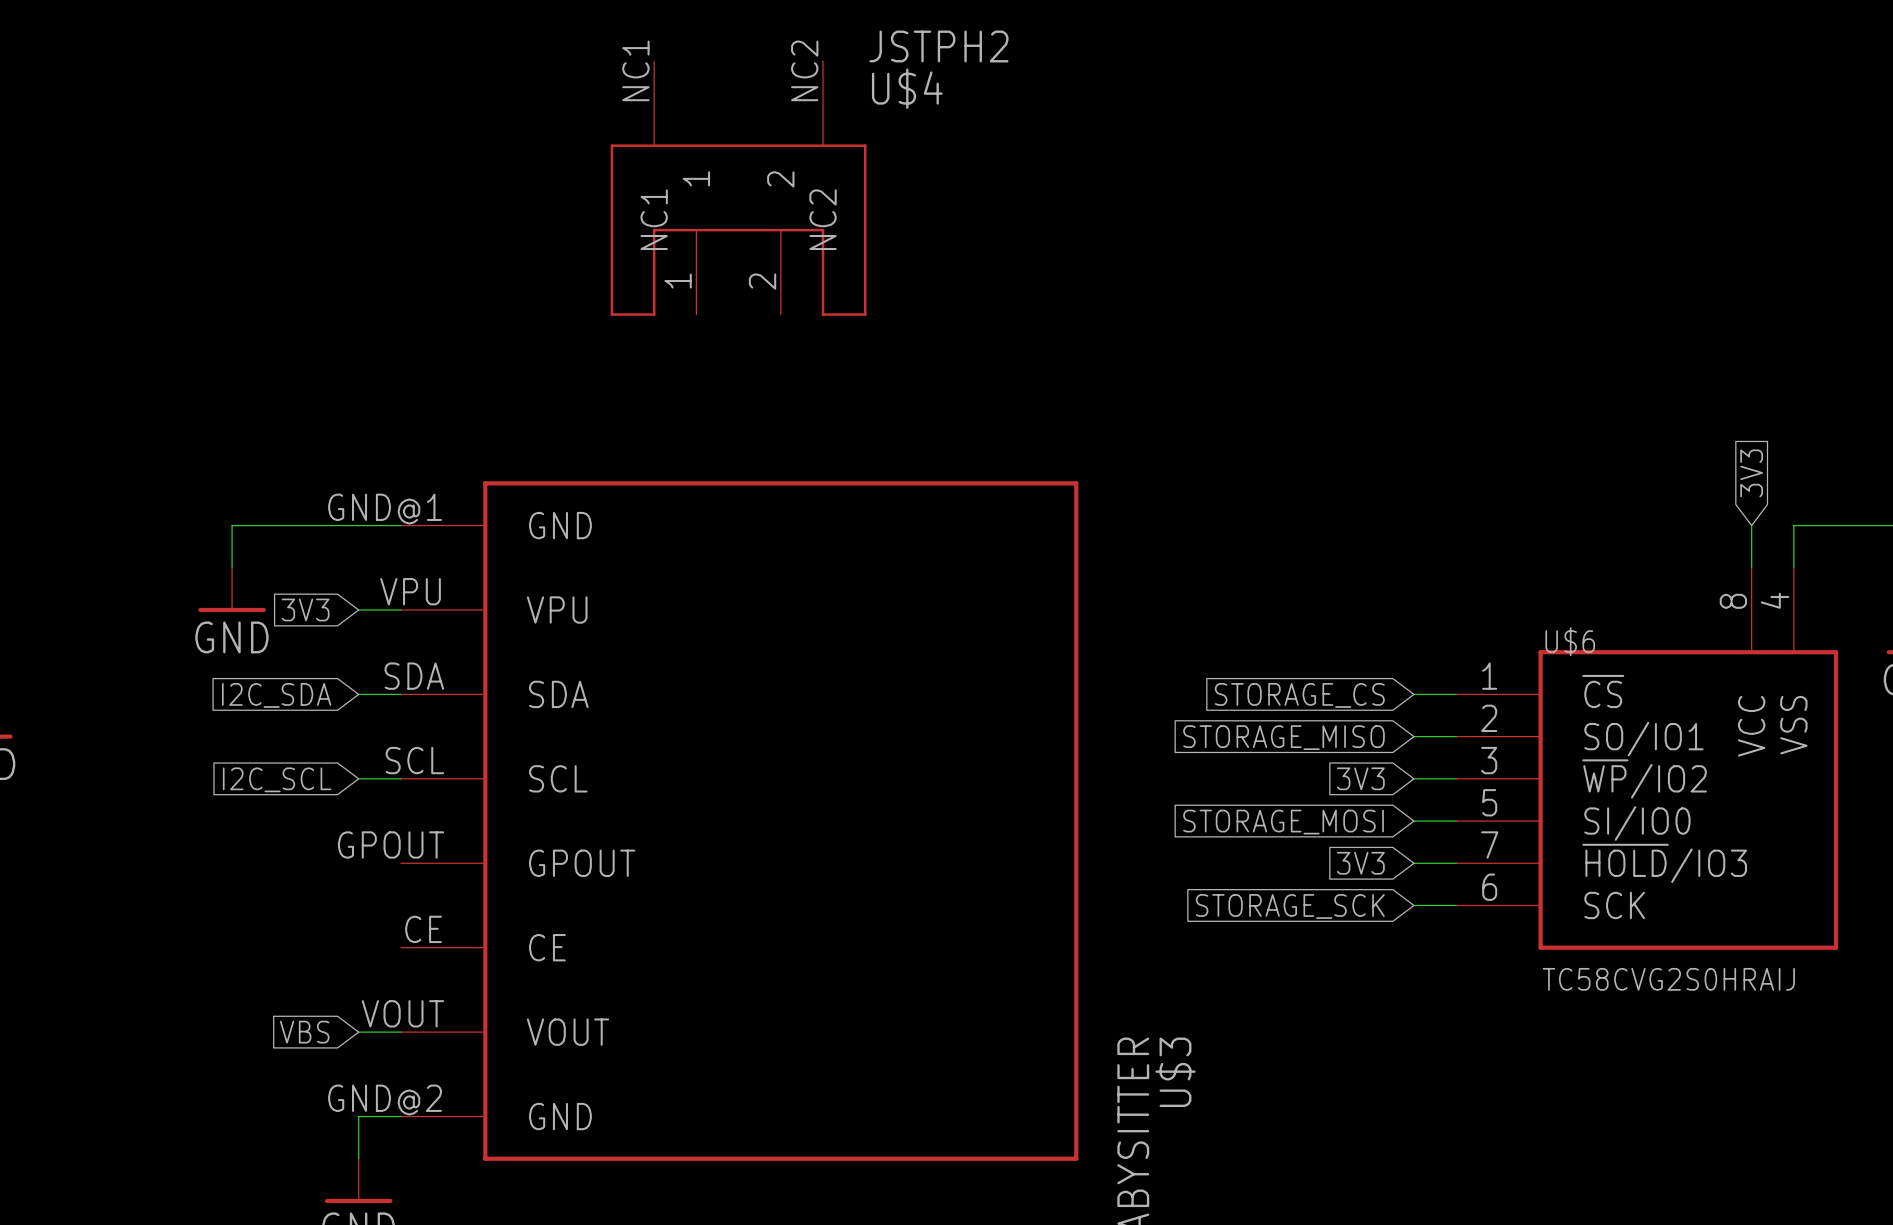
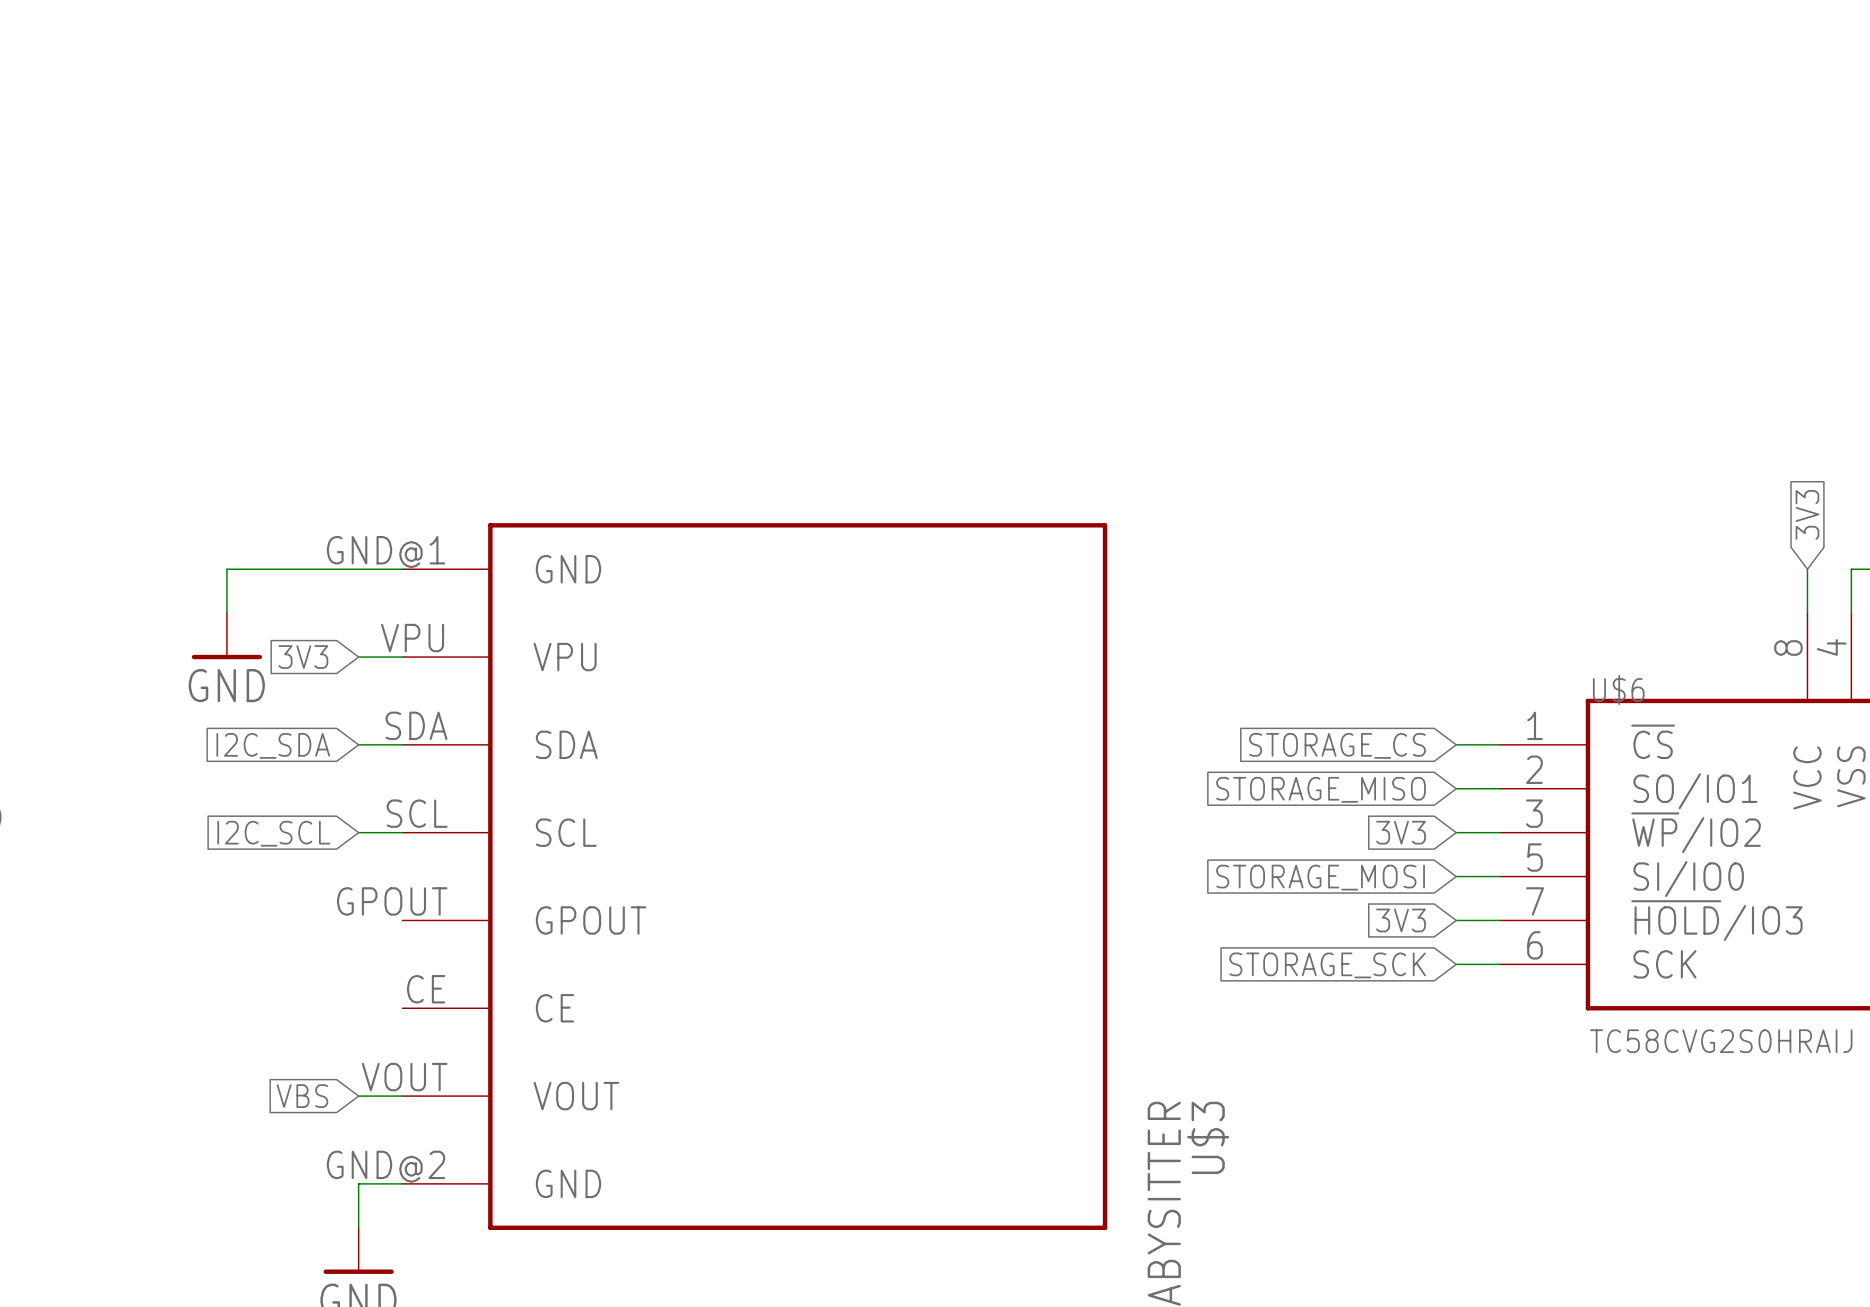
U$4: JSTPH2 (738, 188) -> none

